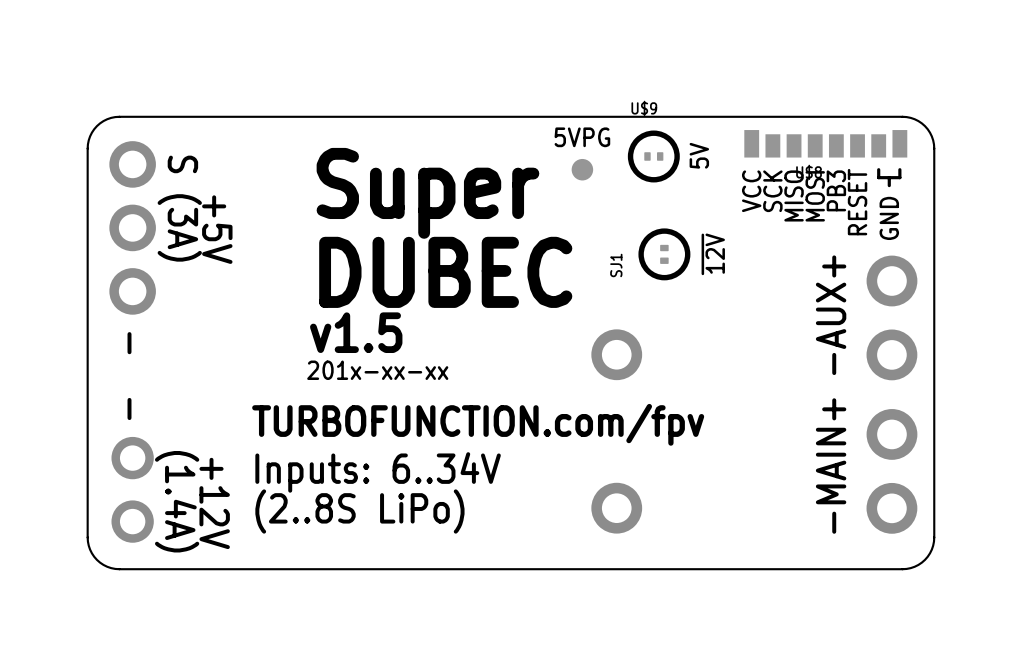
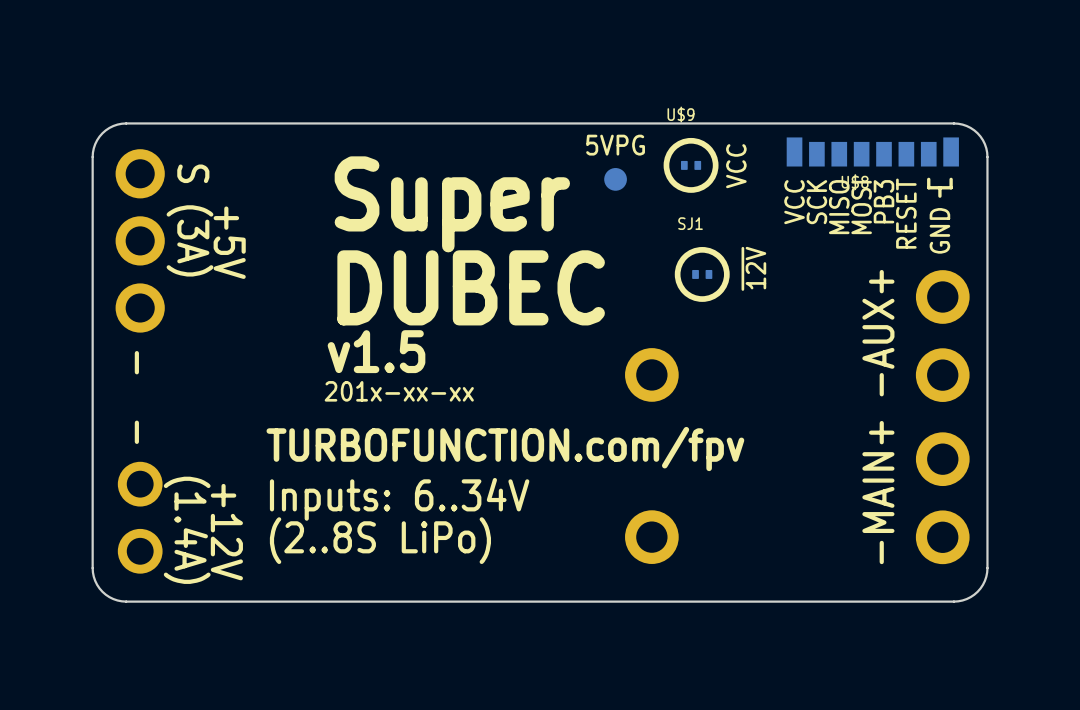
text: 5V (699, 155) -> VCC (736, 166)
SJ1 rotation: 0° (664, 254) -> 90° clockwise (702, 274)

